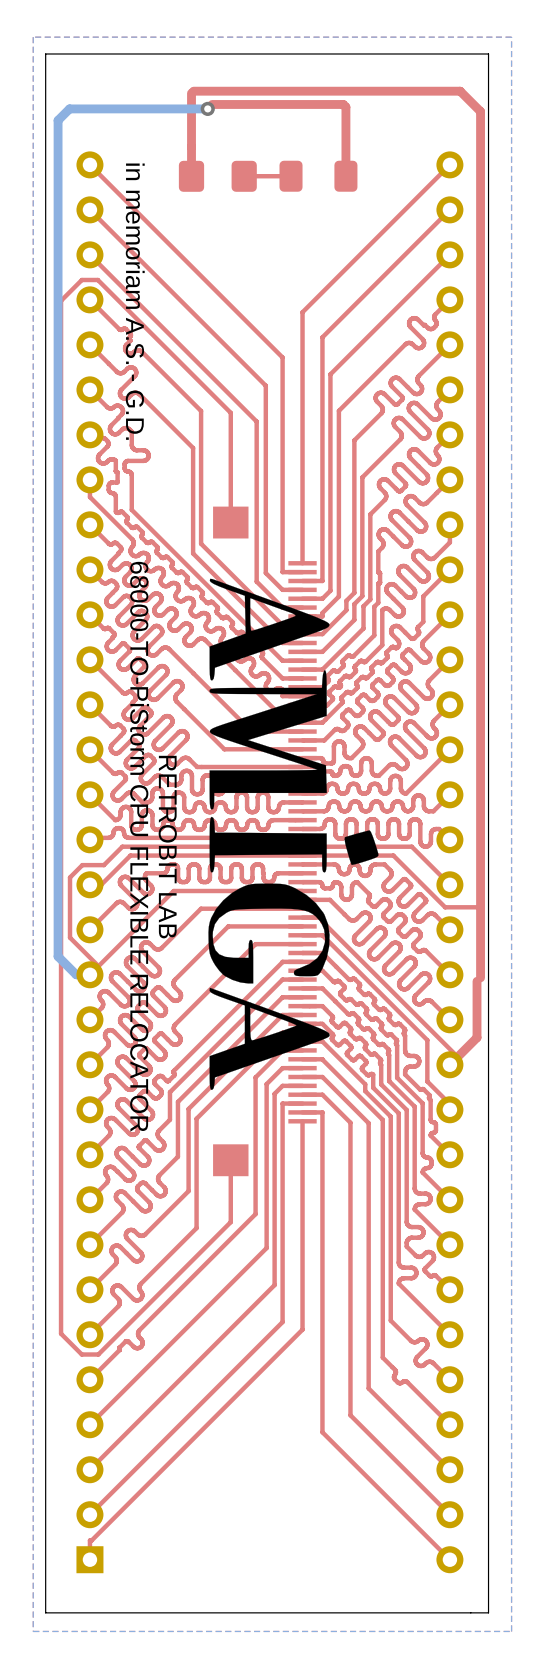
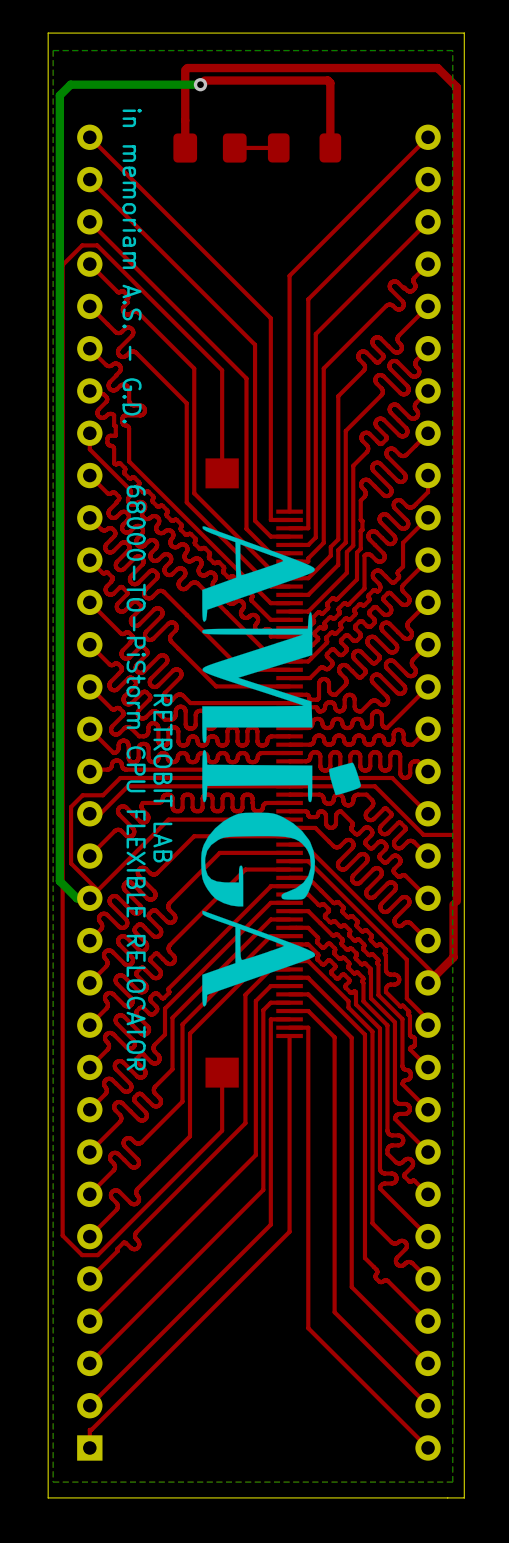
bottom zone outline: (511, 37) (511, 1631) (33, 1631) (33, 37) (511, 37) -> (452, 50) (452, 1482) (53, 1482) (53, 50) (452, 50)

